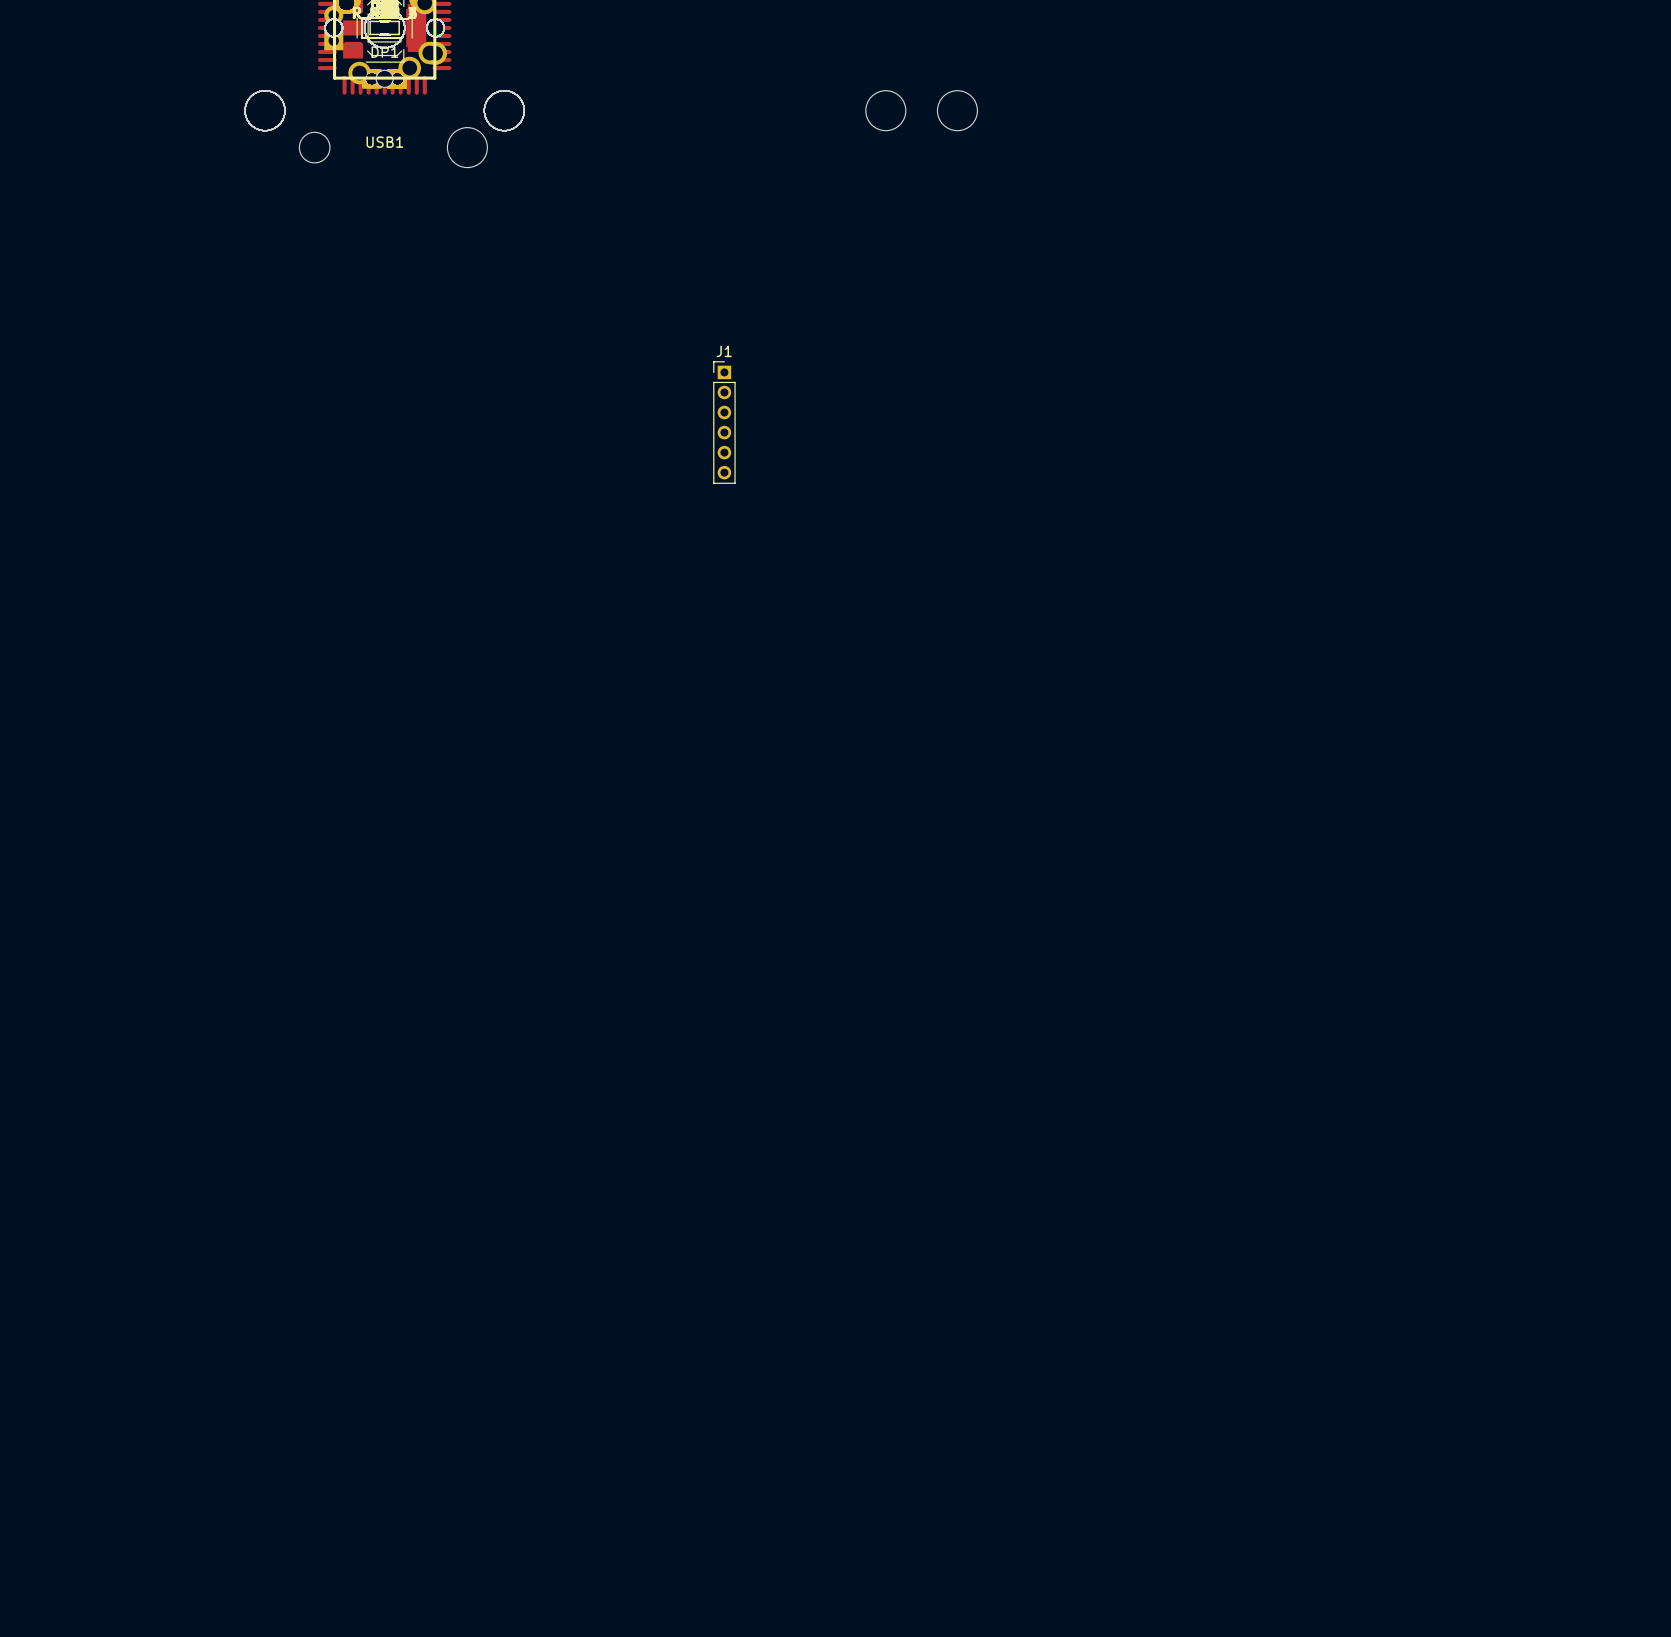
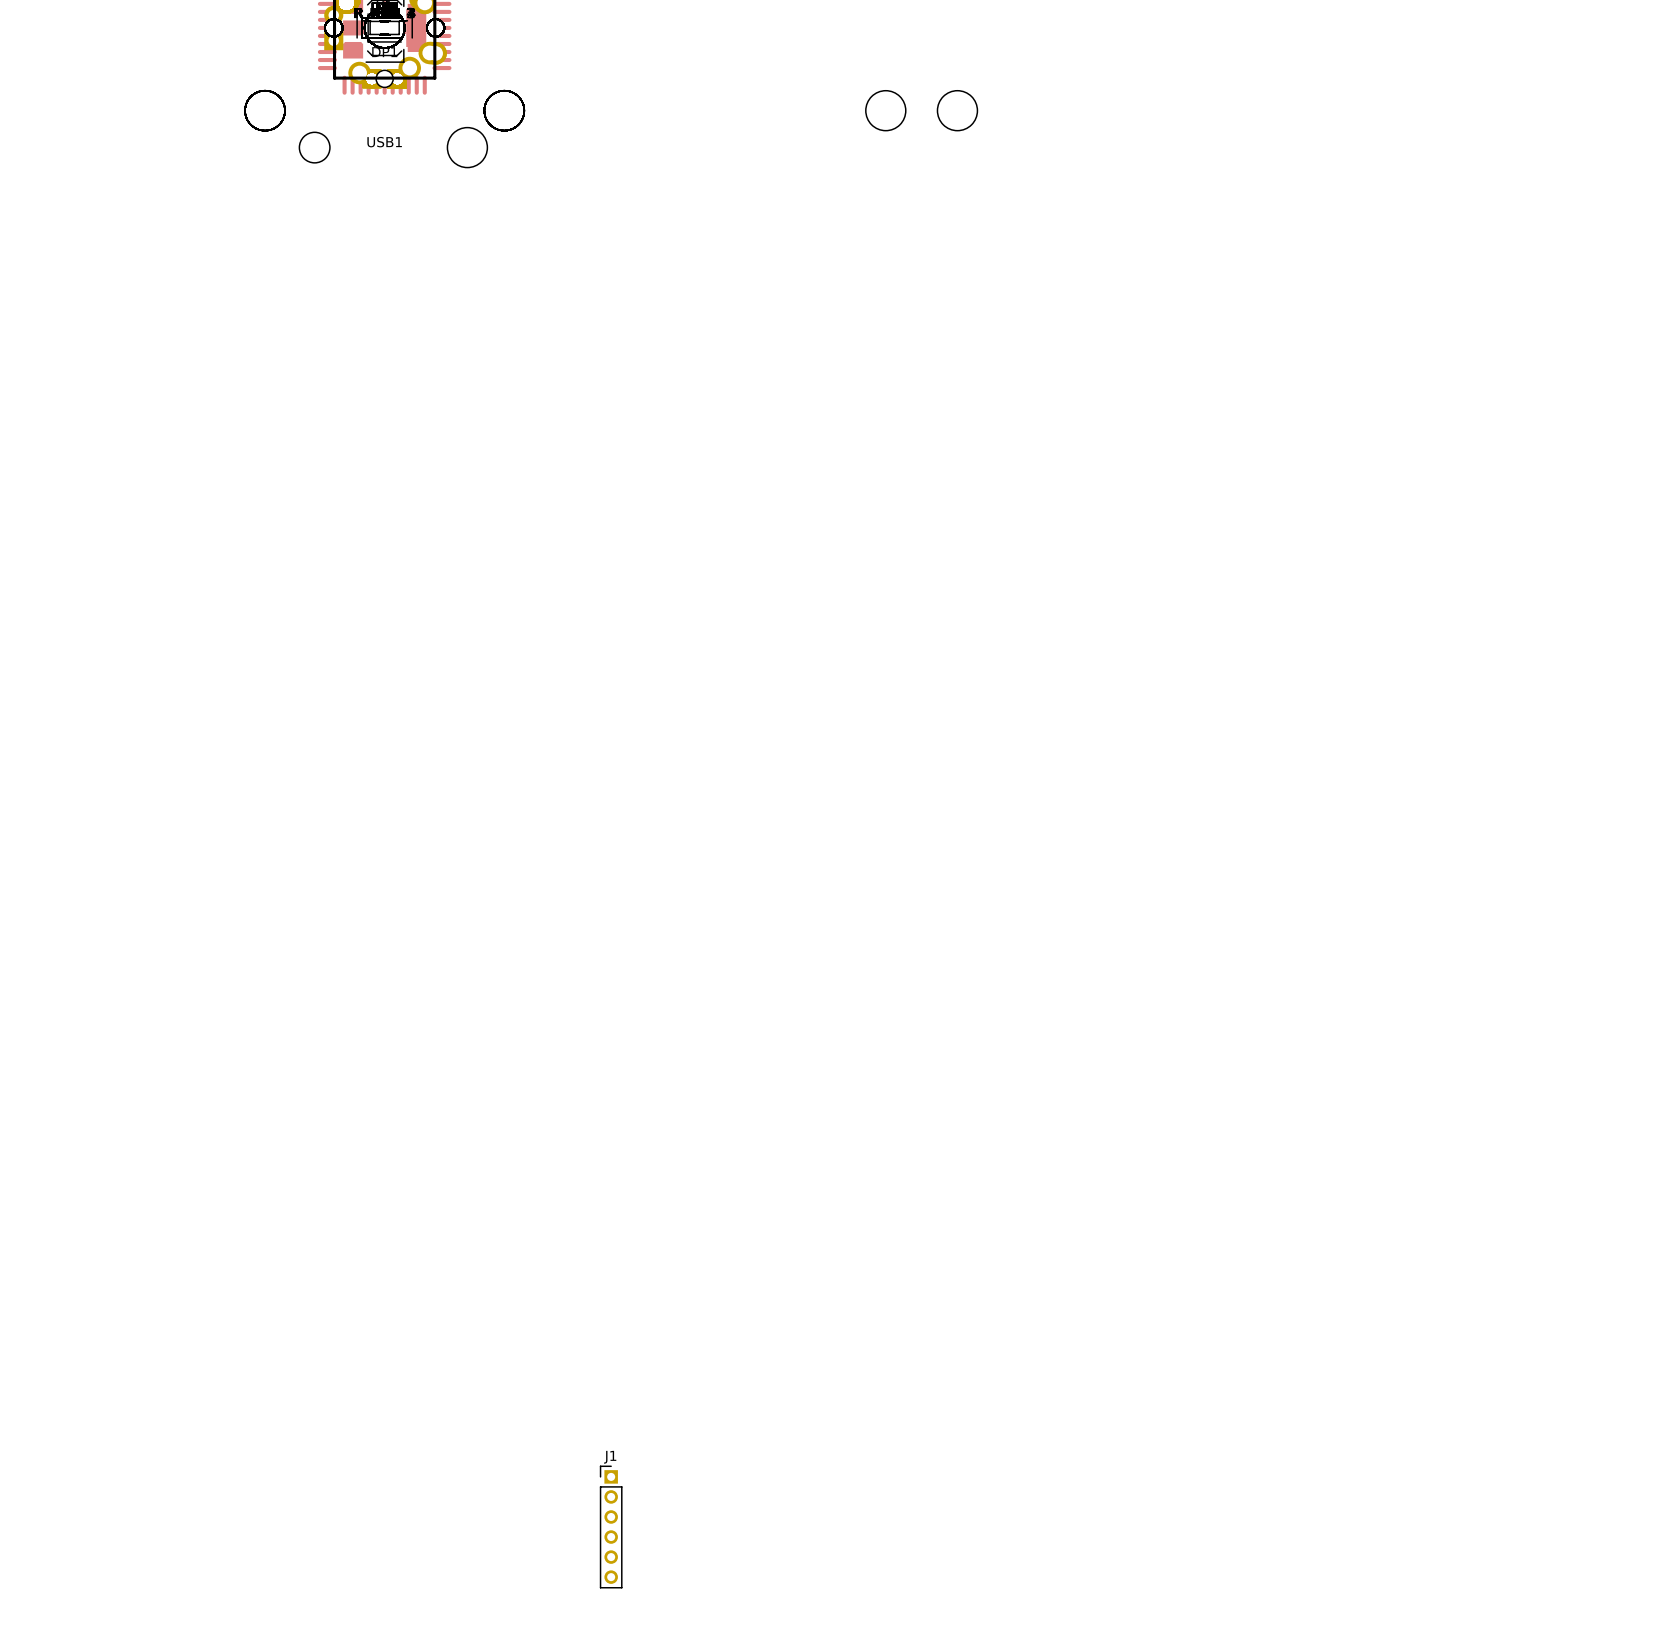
J1 position: (724, 422) -> (611, 1527)

